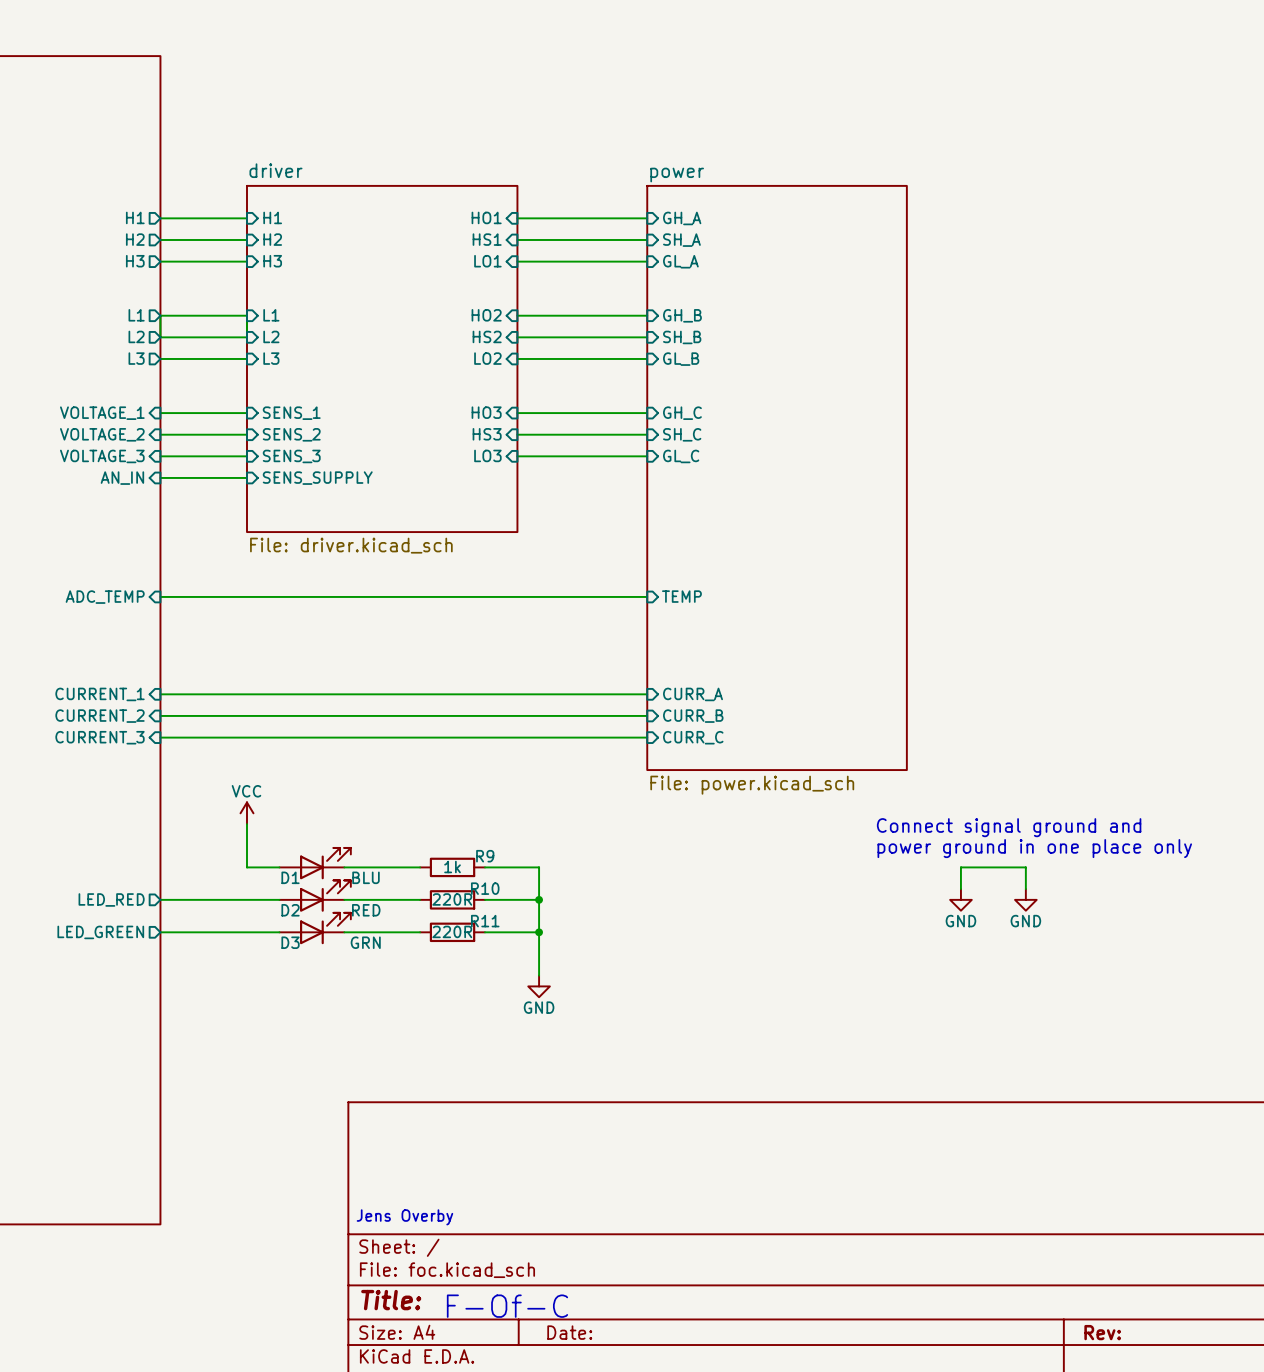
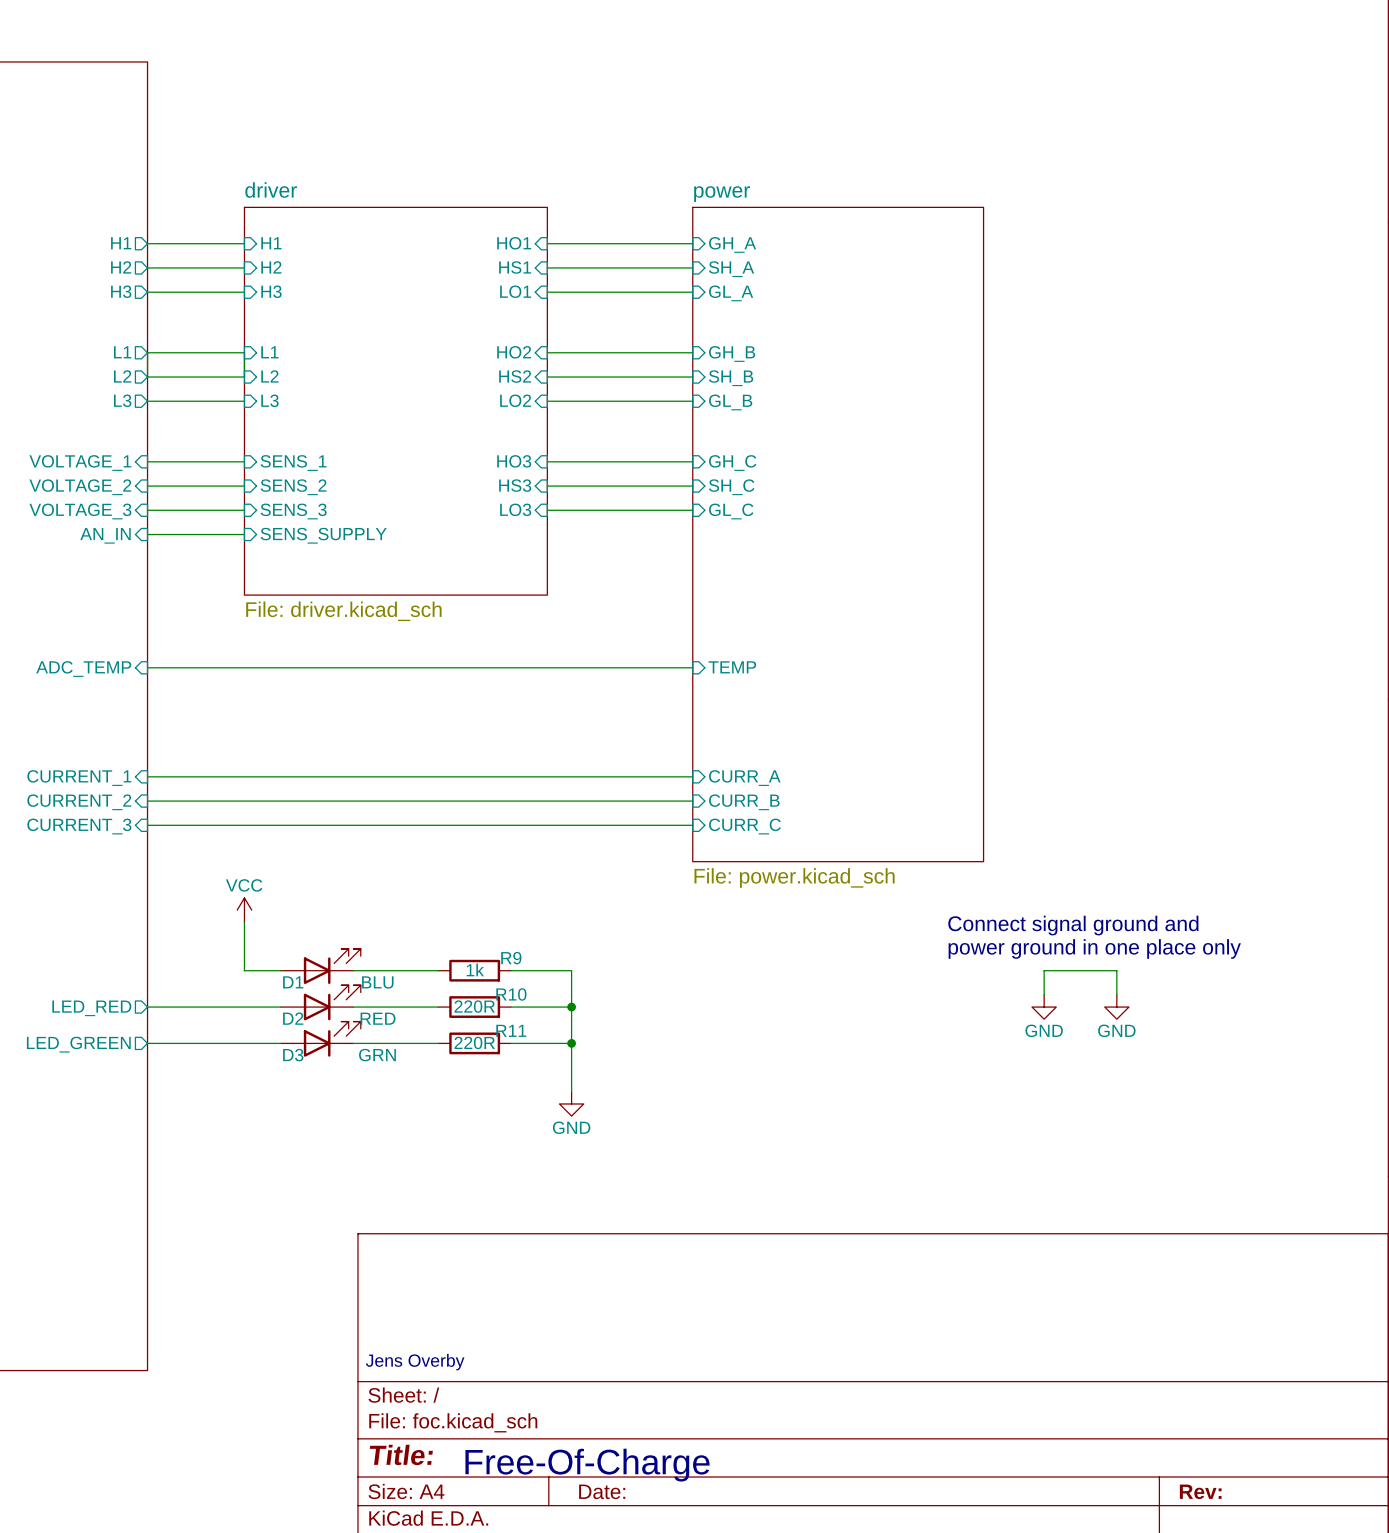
text: F-Of-C (507, 1306) -> Free-Of-Charge (587, 1465)

